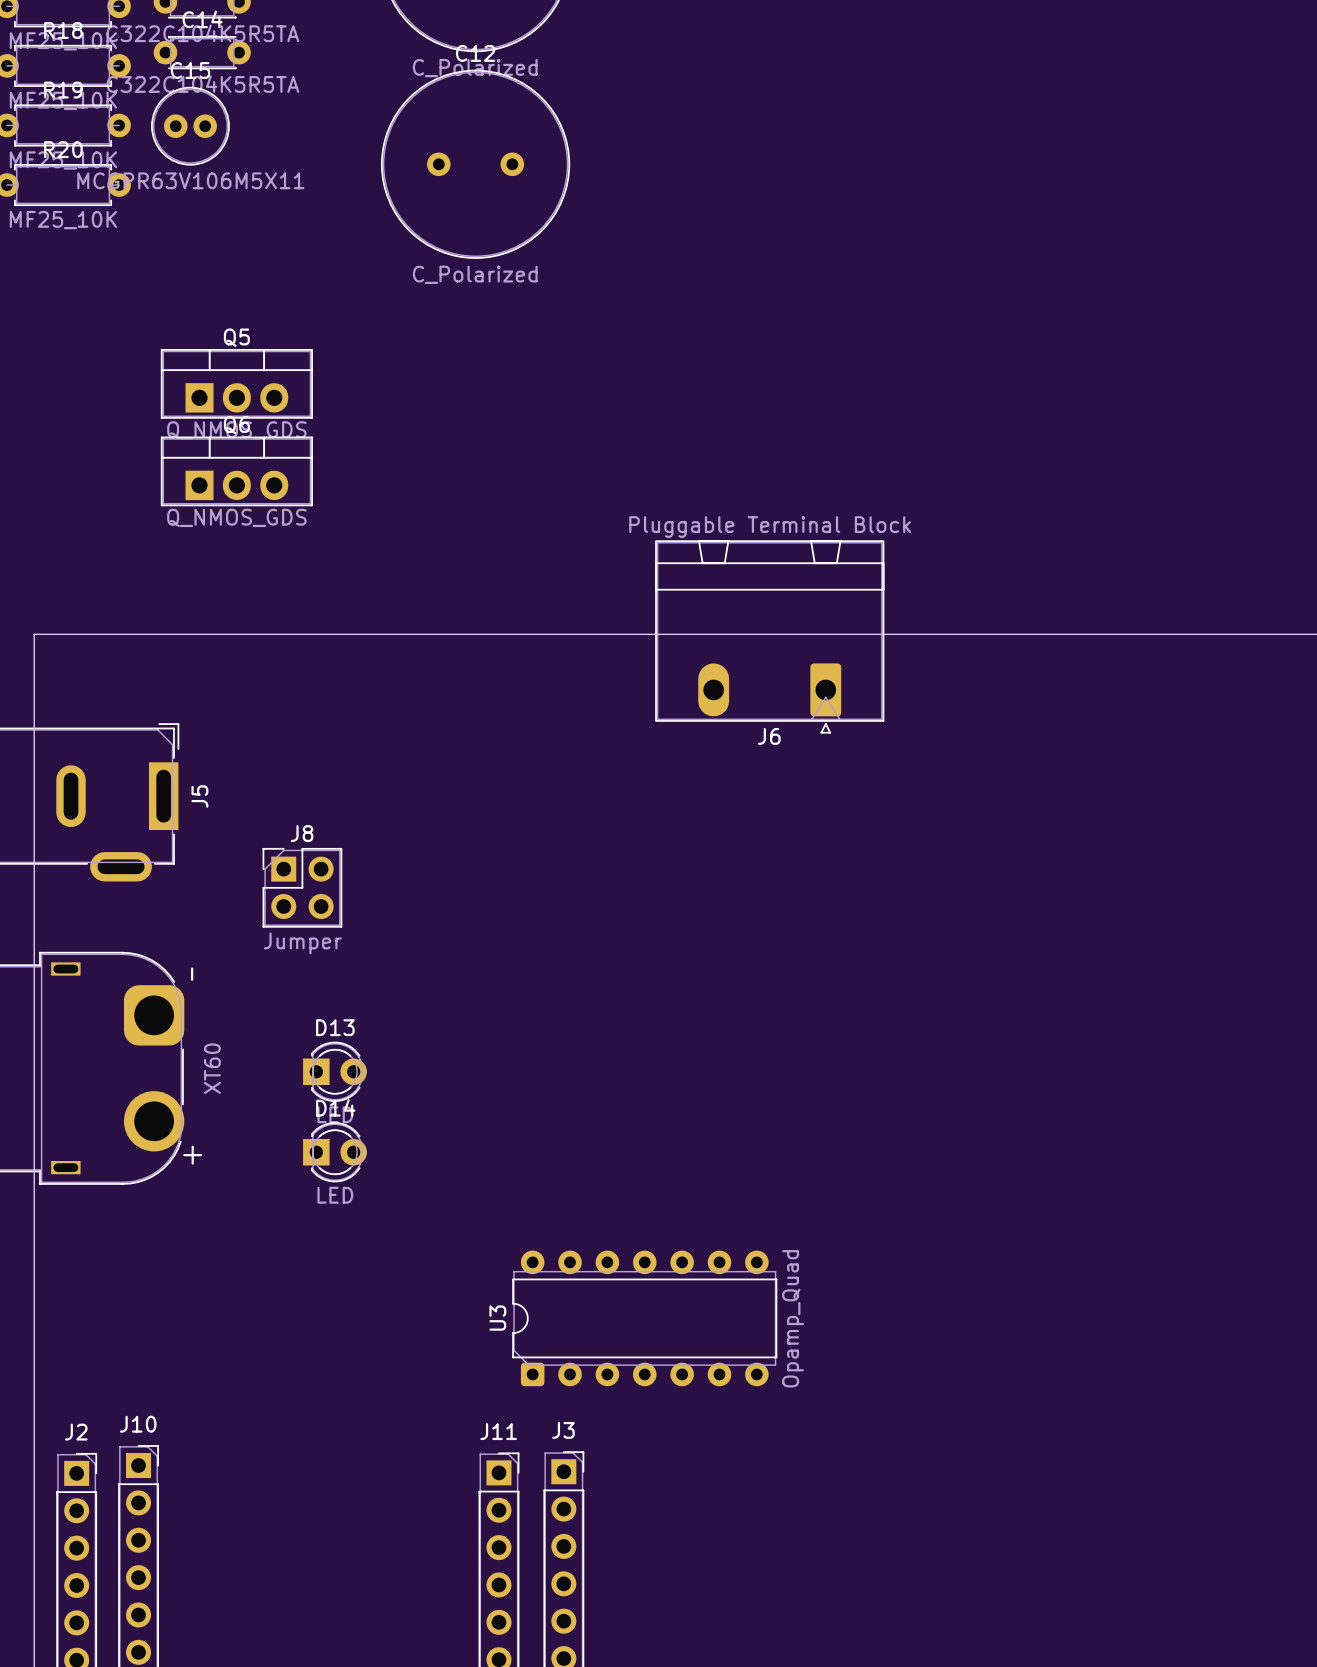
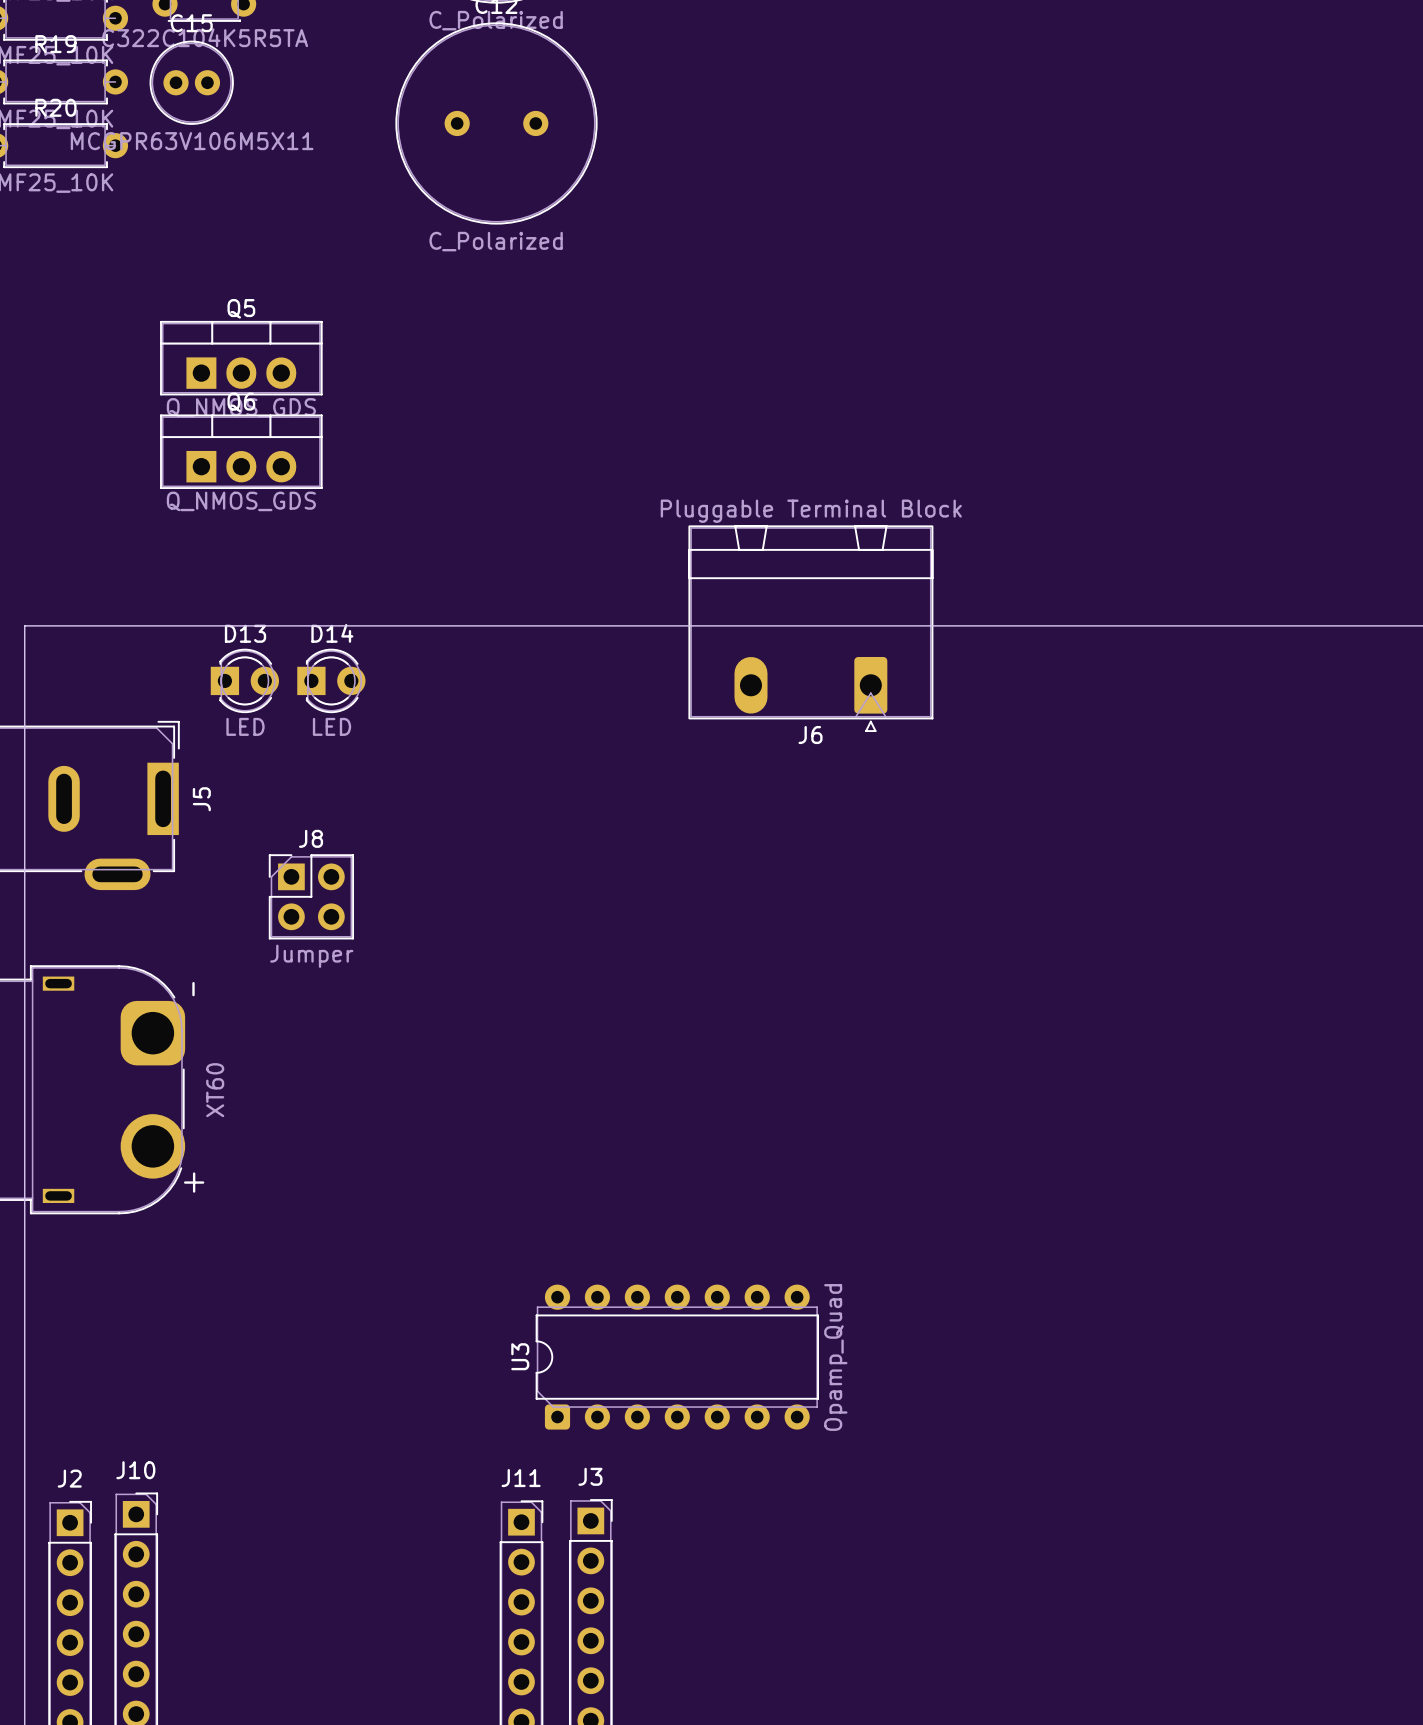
D13 position: (335, 1071) -> (244, 680)
D14 position: (335, 1152) -> (331, 680)

